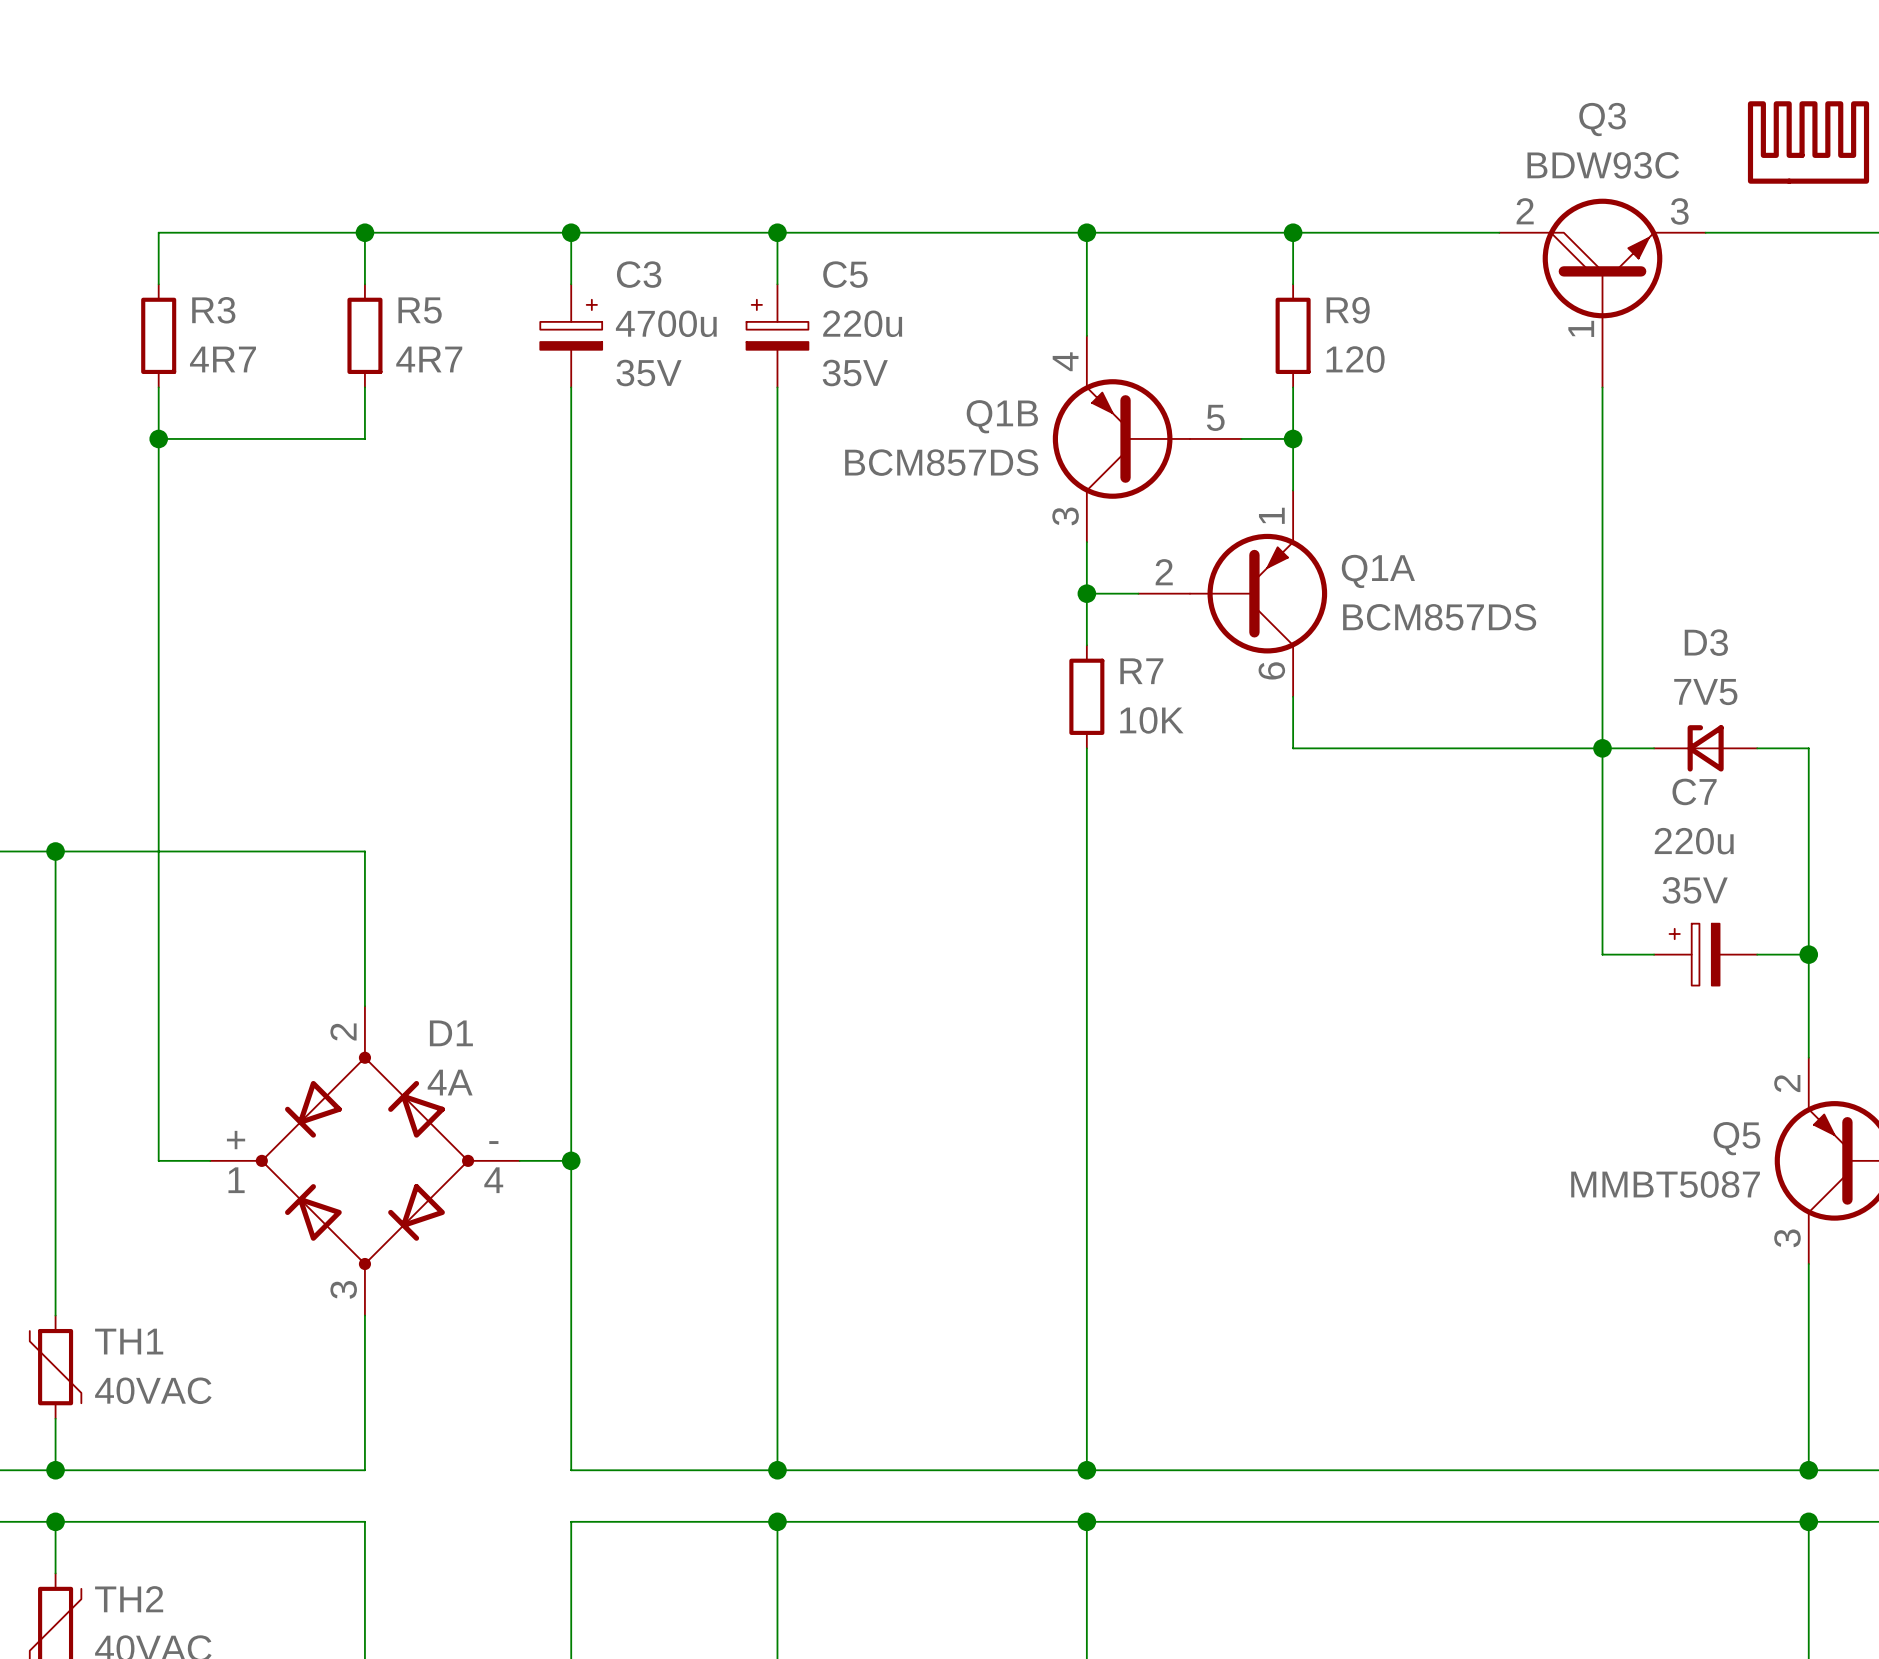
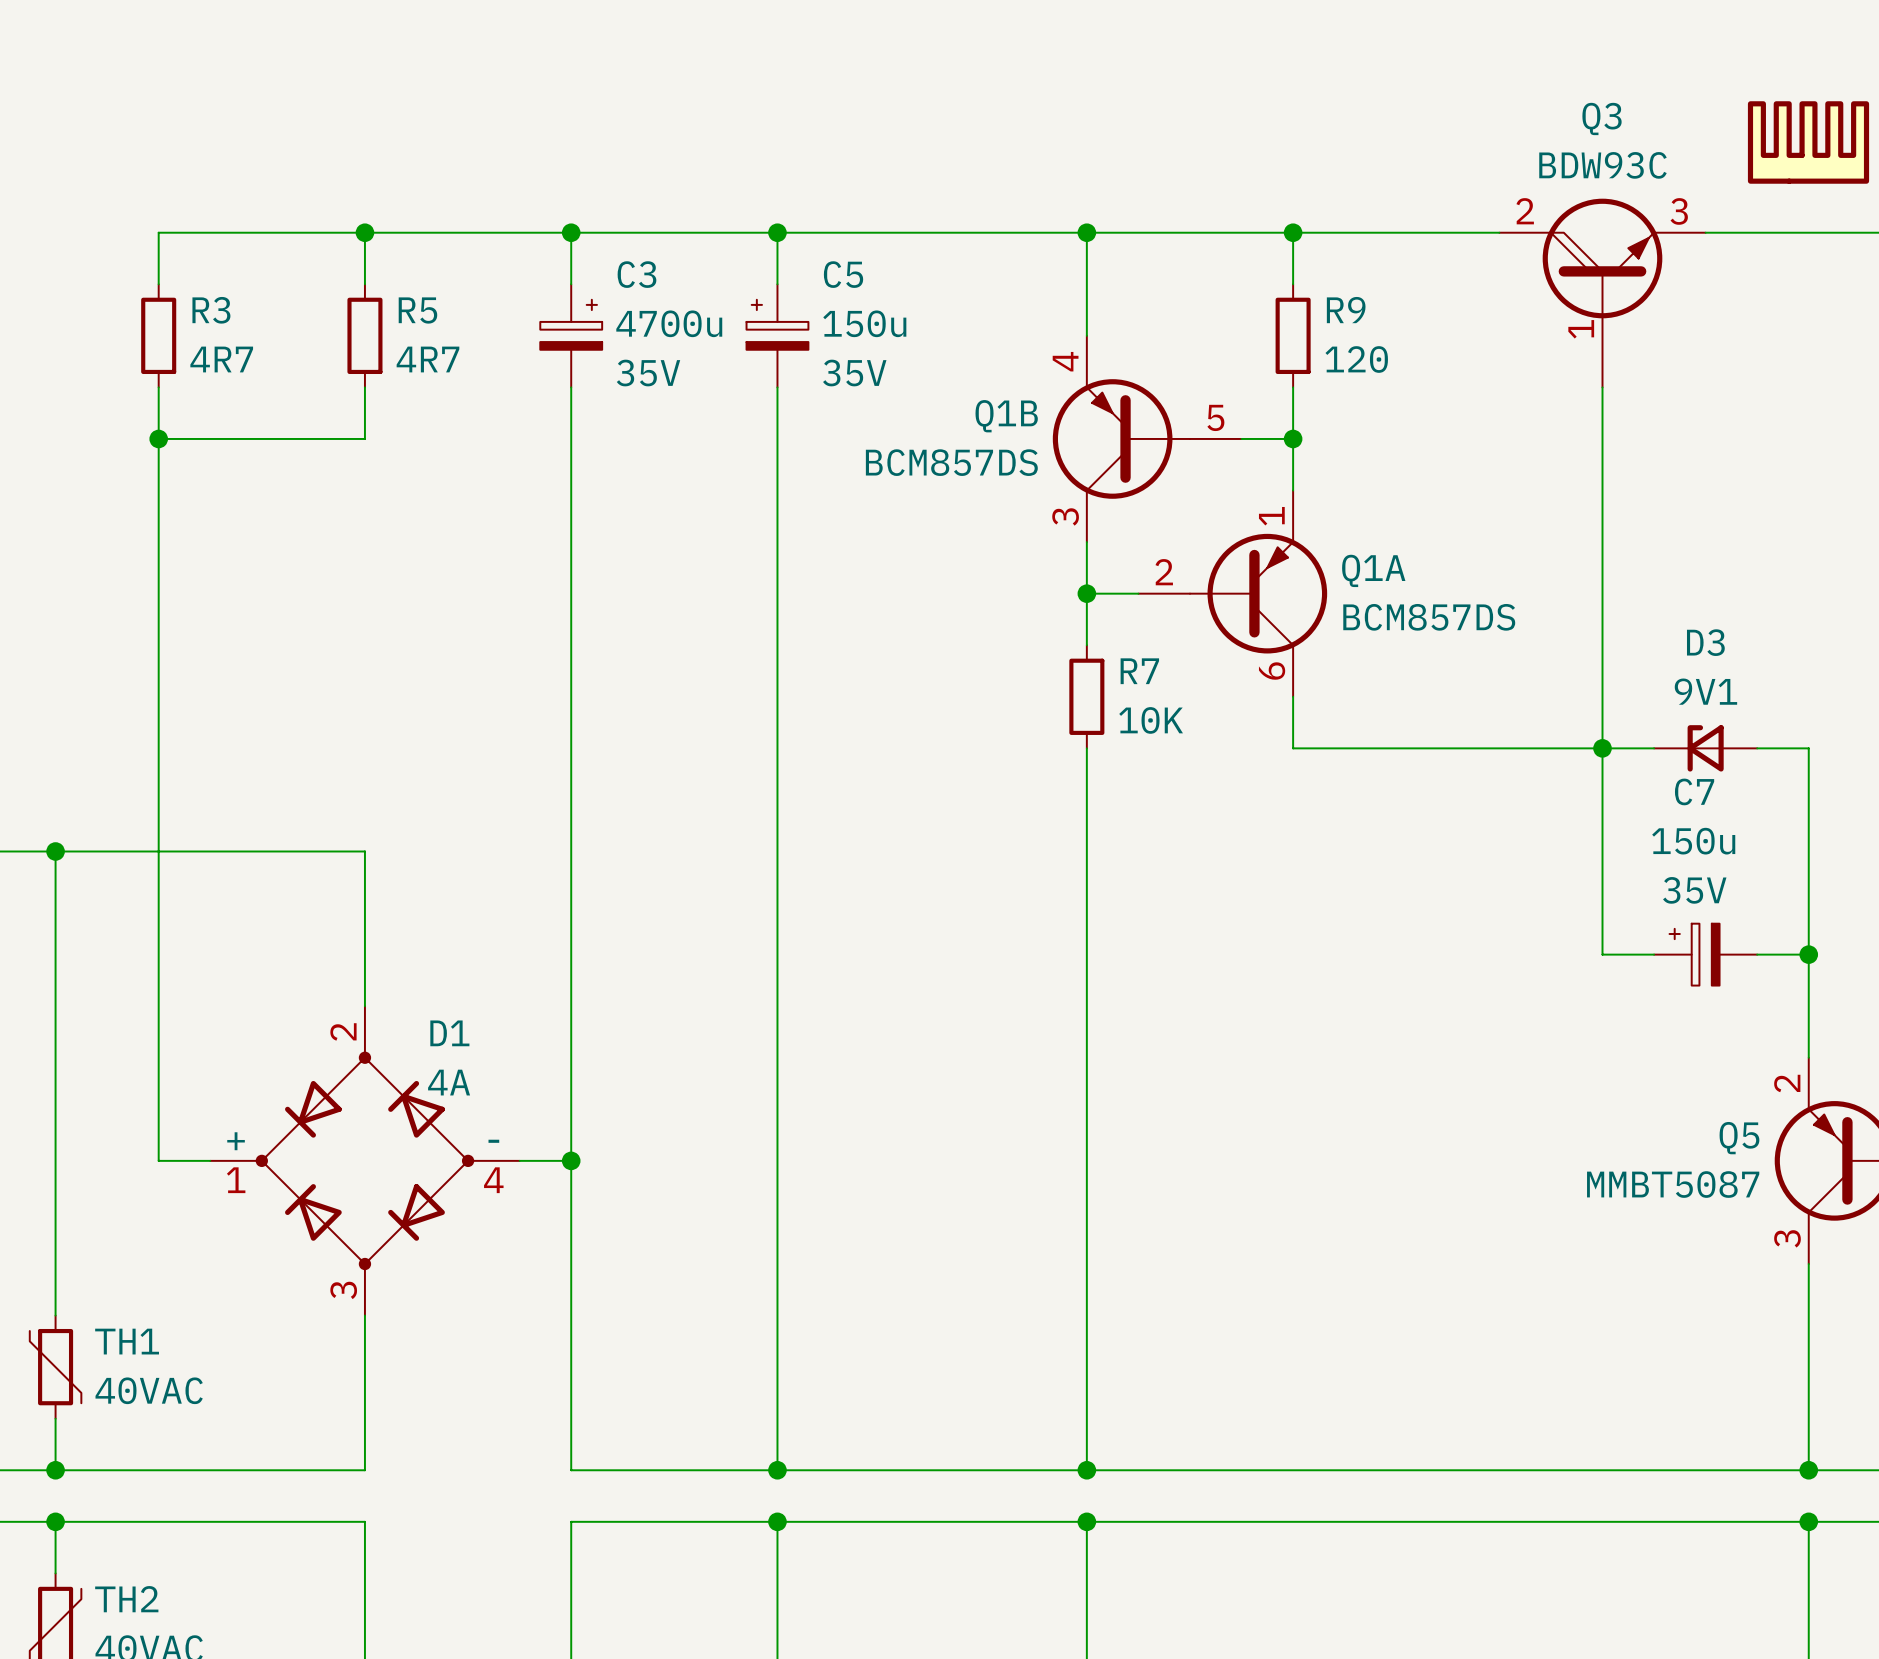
C5 value: 220u (862, 323) -> 150u (864, 323)
D3 value: 7V5 (1705, 692) -> 9V1 (1705, 691)
C7 value: 220u (1694, 841) -> 150u (1693, 841)

